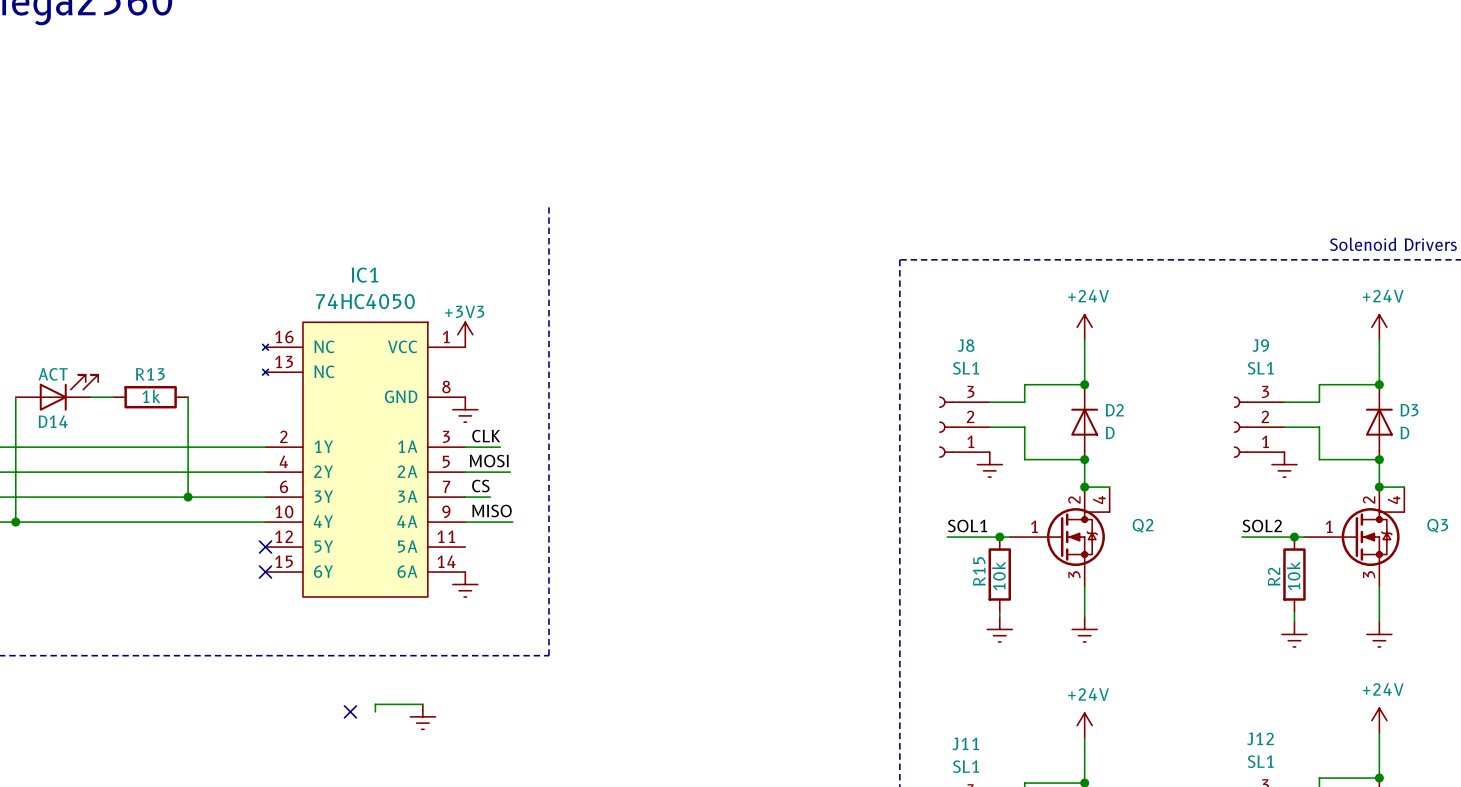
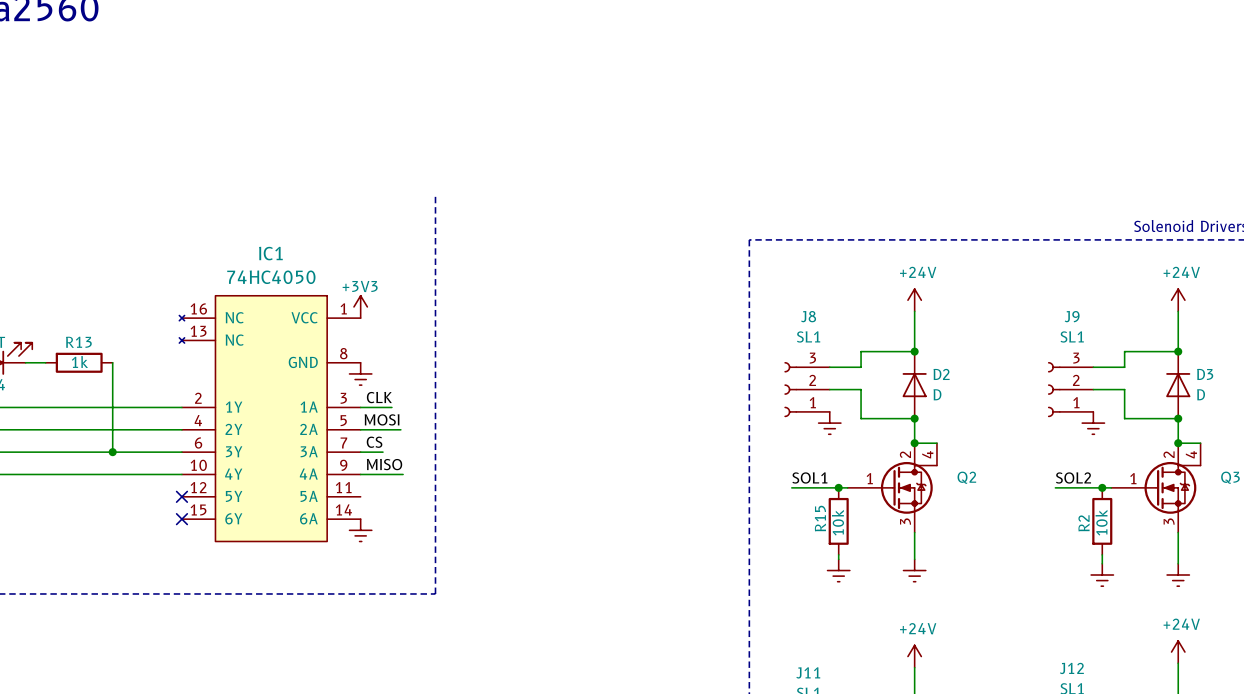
wire: (422, 704) (375, 704) (375, 711) -> none
no-connect mark: (350, 711) -> none
power symbol: (422, 716) -> none

